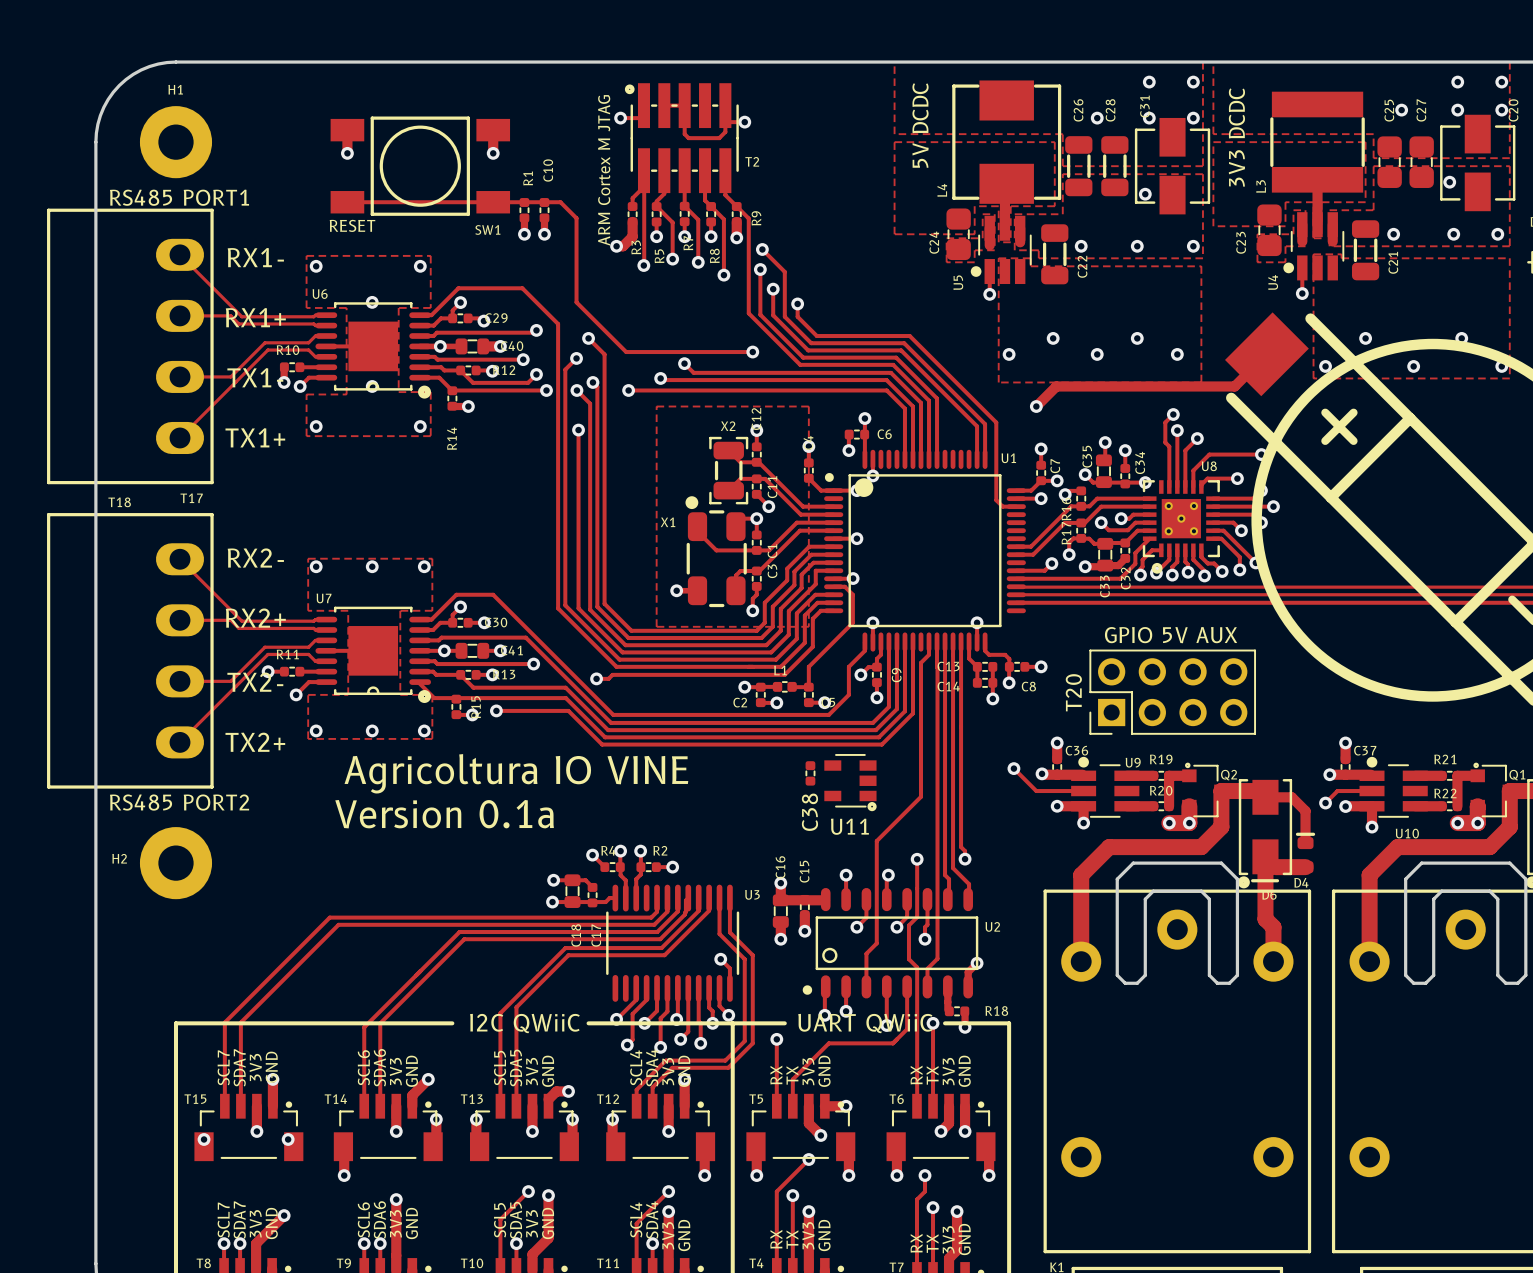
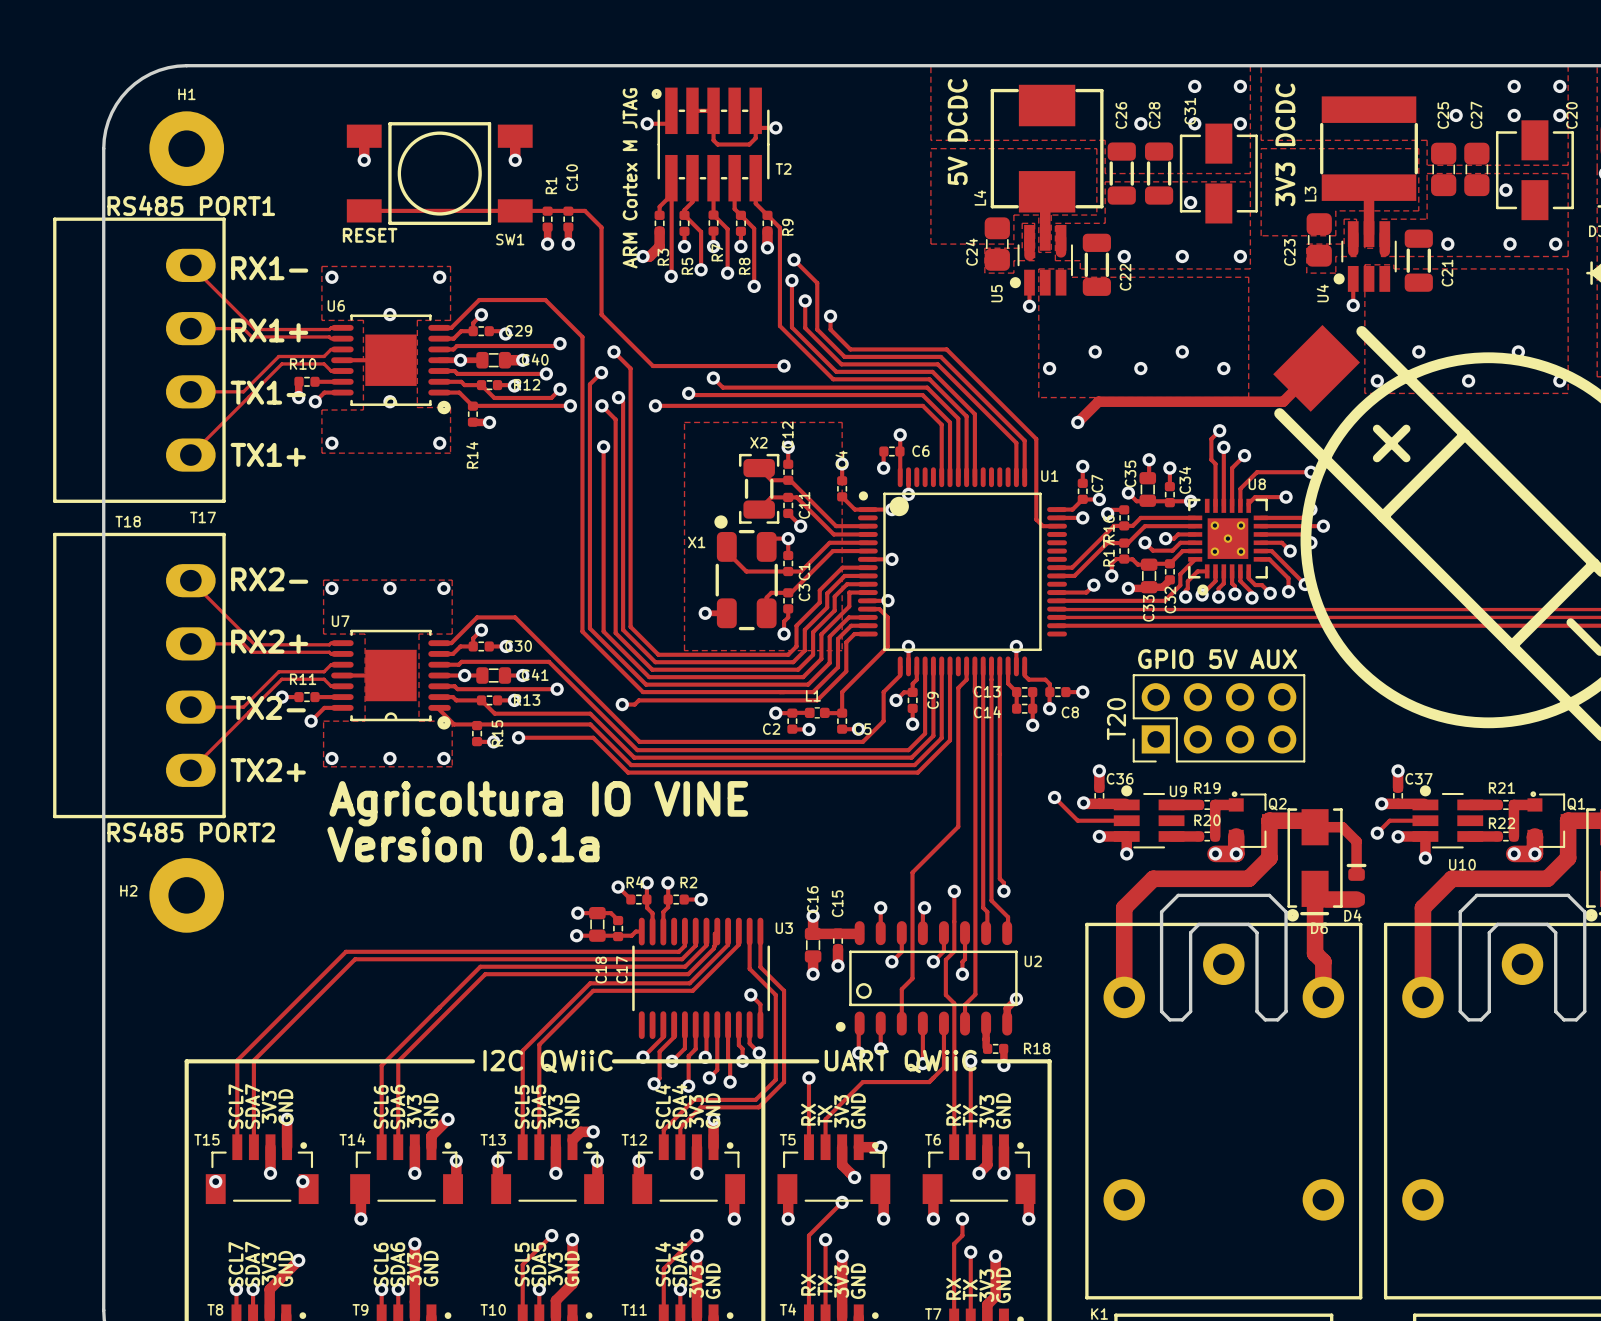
C38: (810, 773) -> none
U11: (850, 782) -> none

